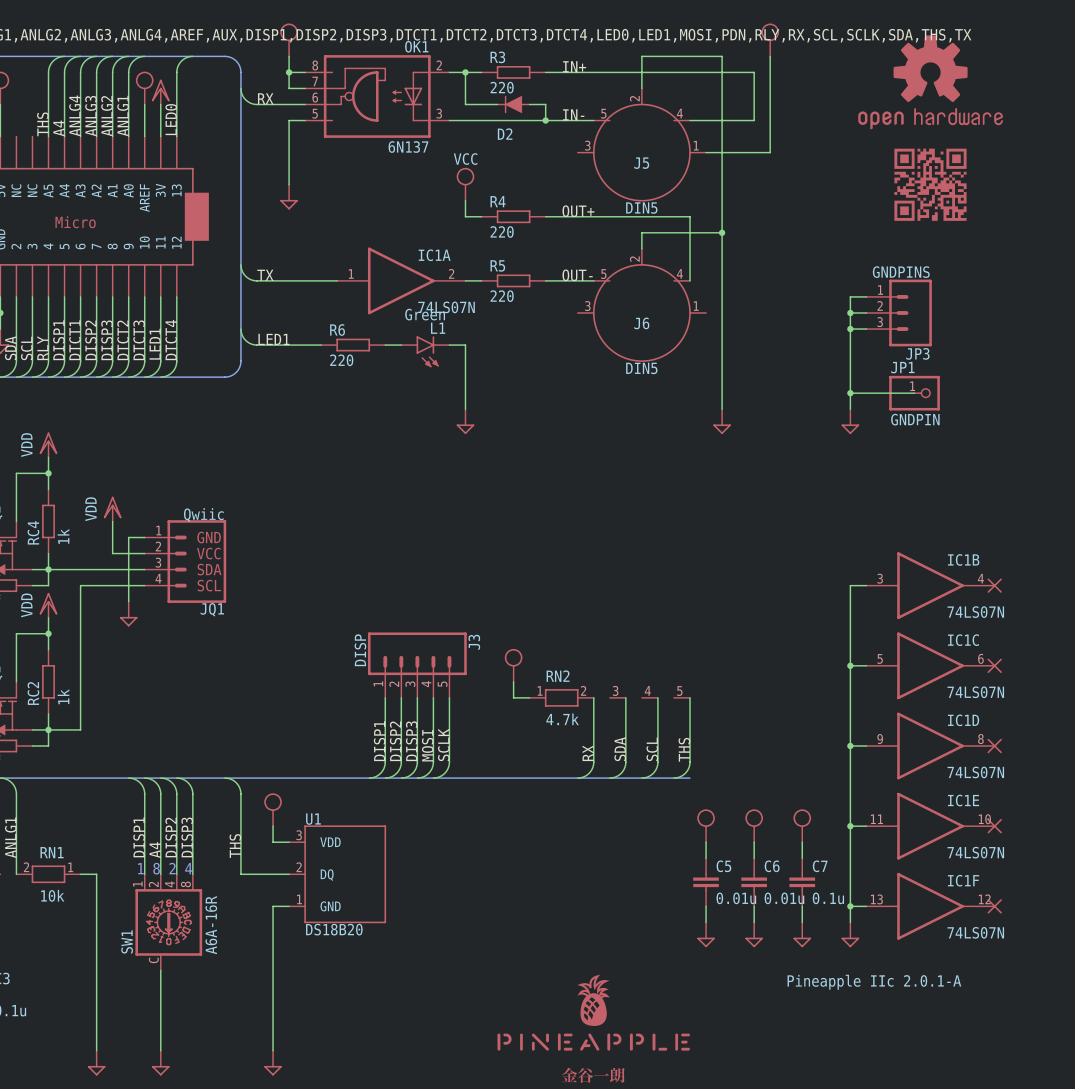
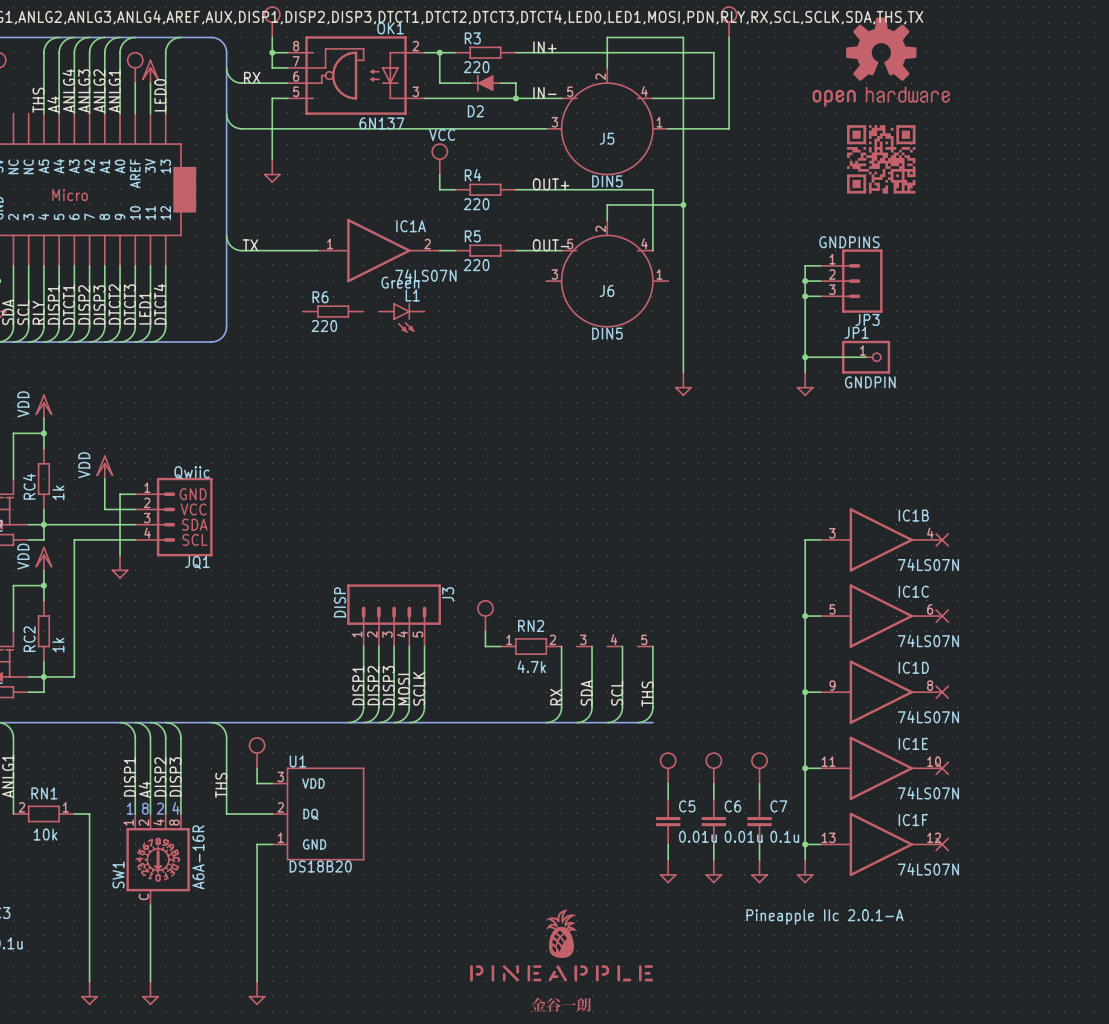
wire: none -> (226, 113) (231, 124) (241, 128) (546, 128)
wire: (240, 329) (244, 338) (252, 344) (321, 345) -> none
label: LED1 (273, 339) -> none
wire: (385, 345) (401, 345) -> none
wire: (449, 345) (465, 345) (465, 409) -> none
power symbol: (465, 421) -> none

